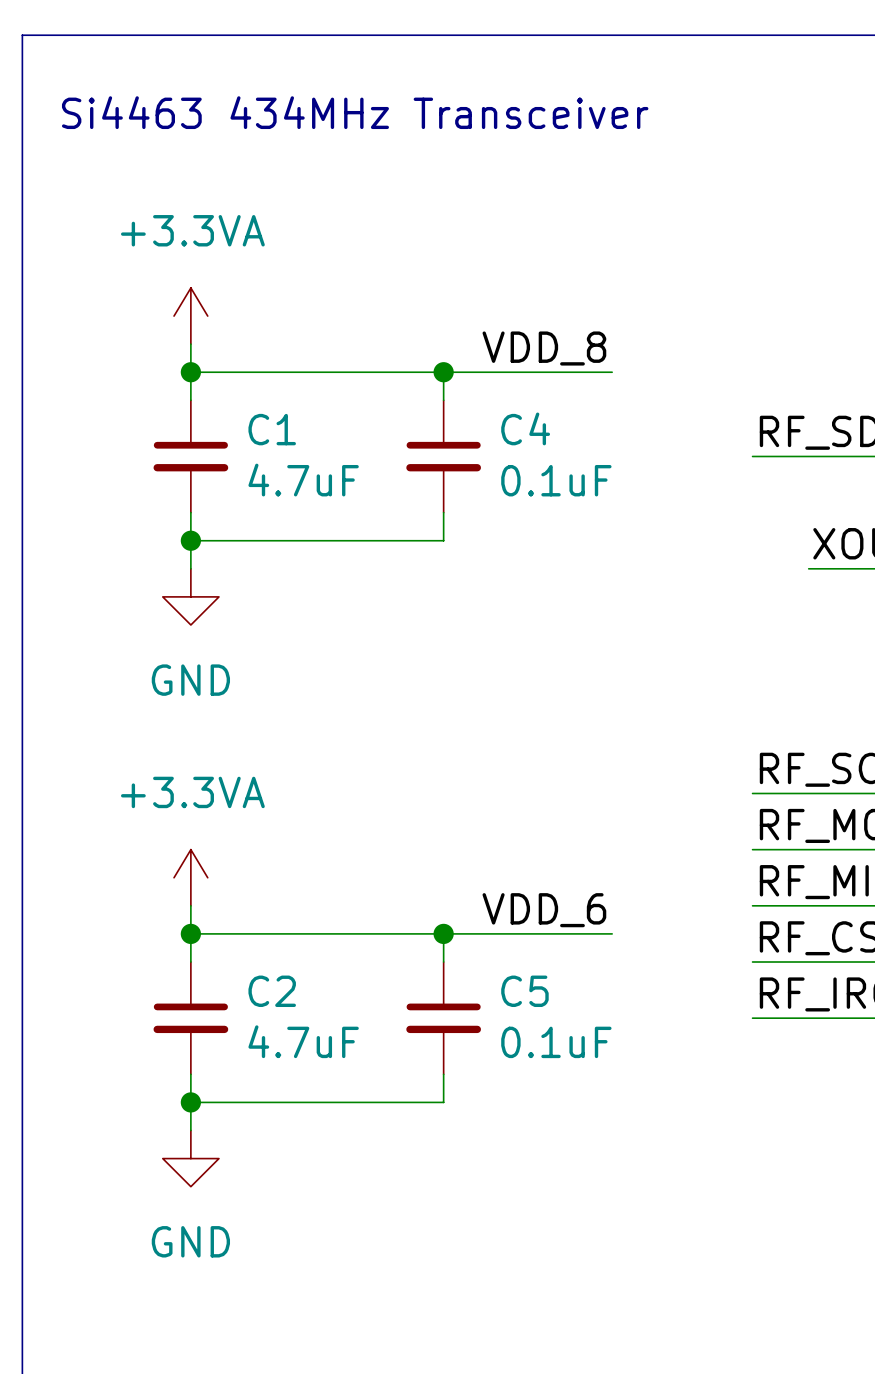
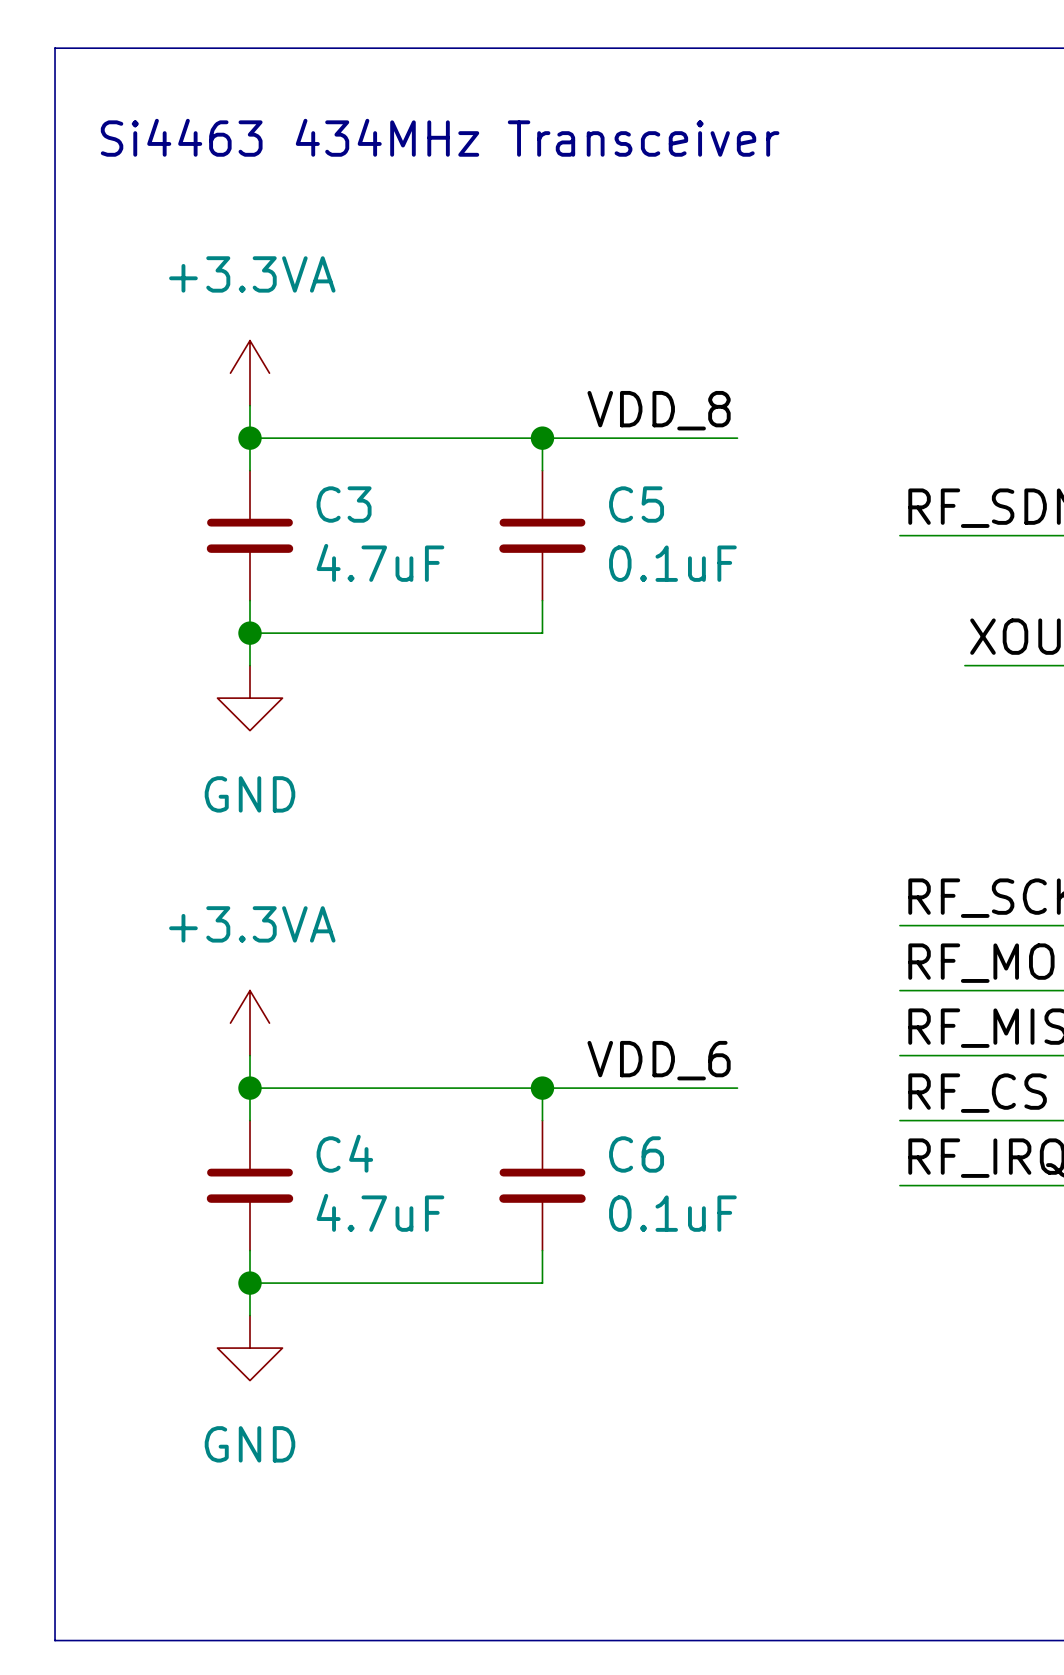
C4 name: C4 (525, 428) -> C5 (636, 504)
C1 name: C1 (272, 429) -> C3 (344, 504)
C2 name: C2 (272, 991) -> C4 (344, 1153)
C5 name: C5 (524, 991) -> C6 (636, 1154)

